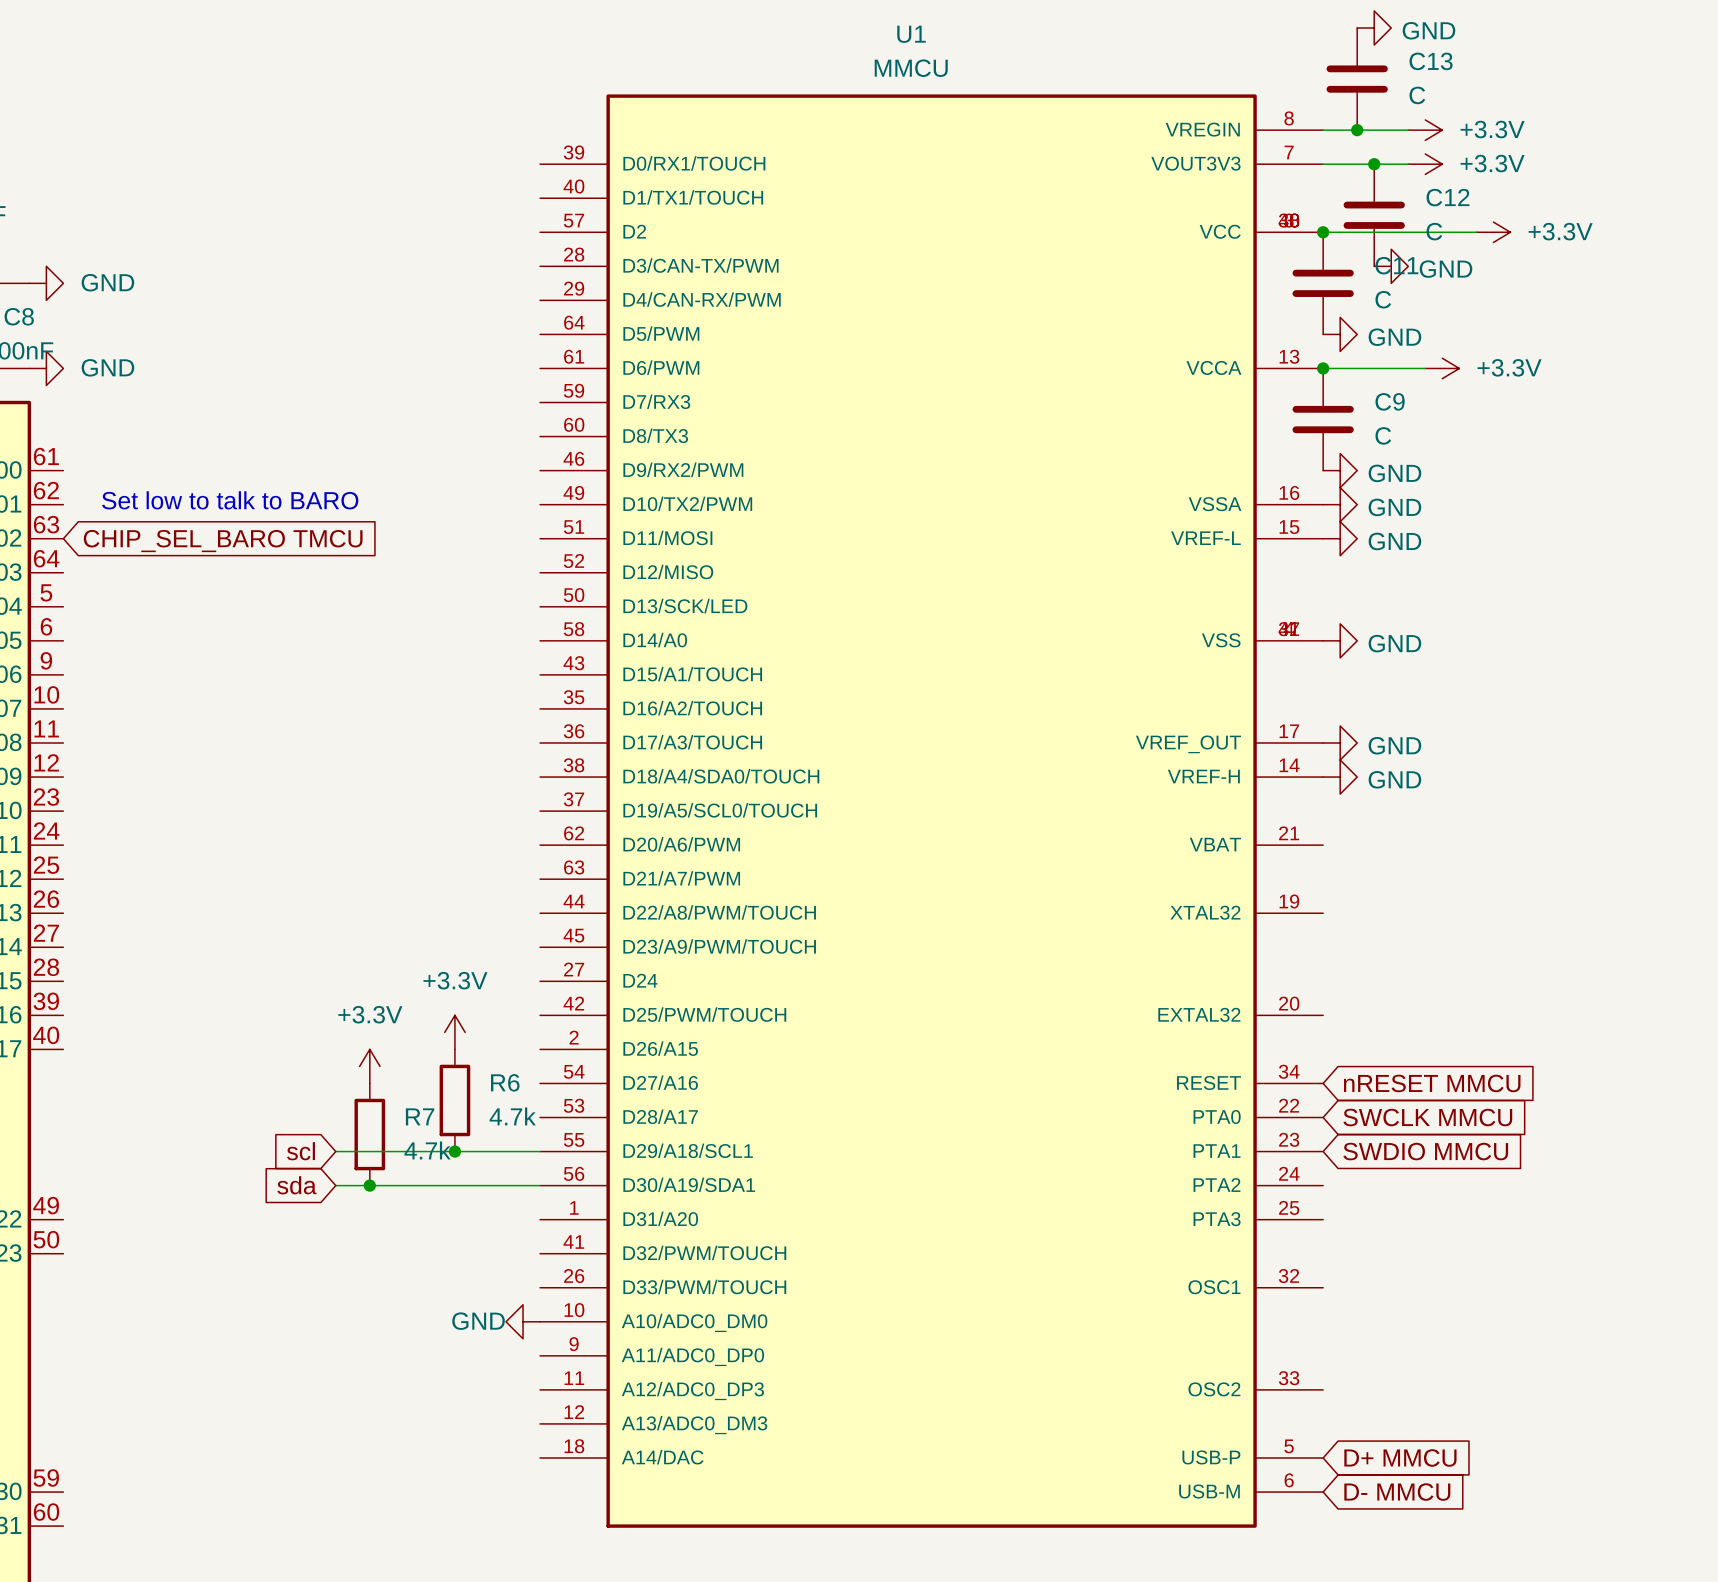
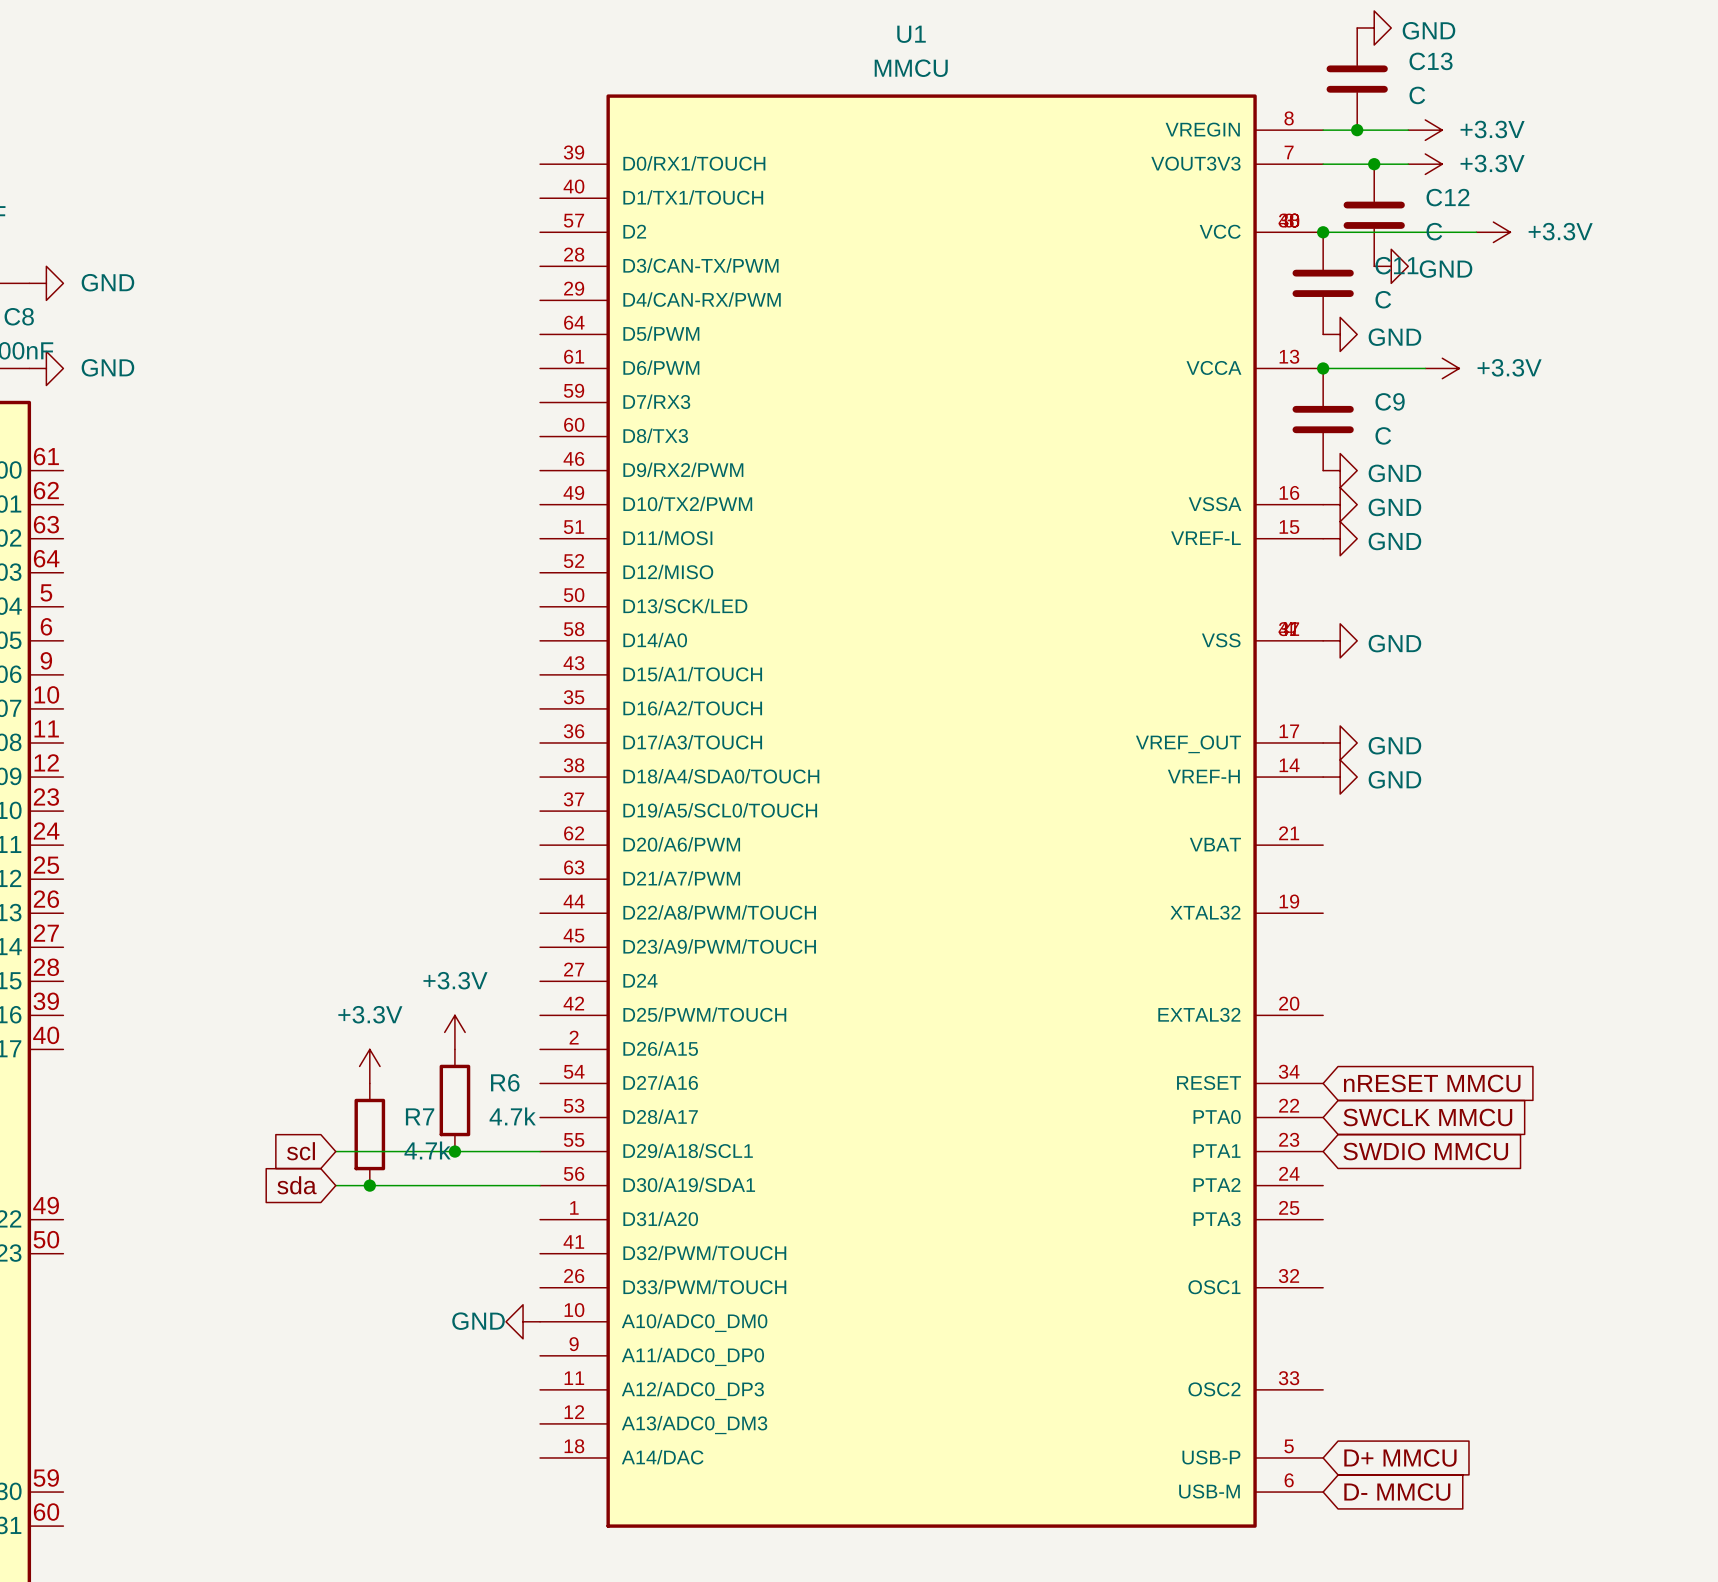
text: Set low to talk to BARO (230, 500) -> none
global label: CHIP_SEL_BARO TMCU (223, 541) -> none

